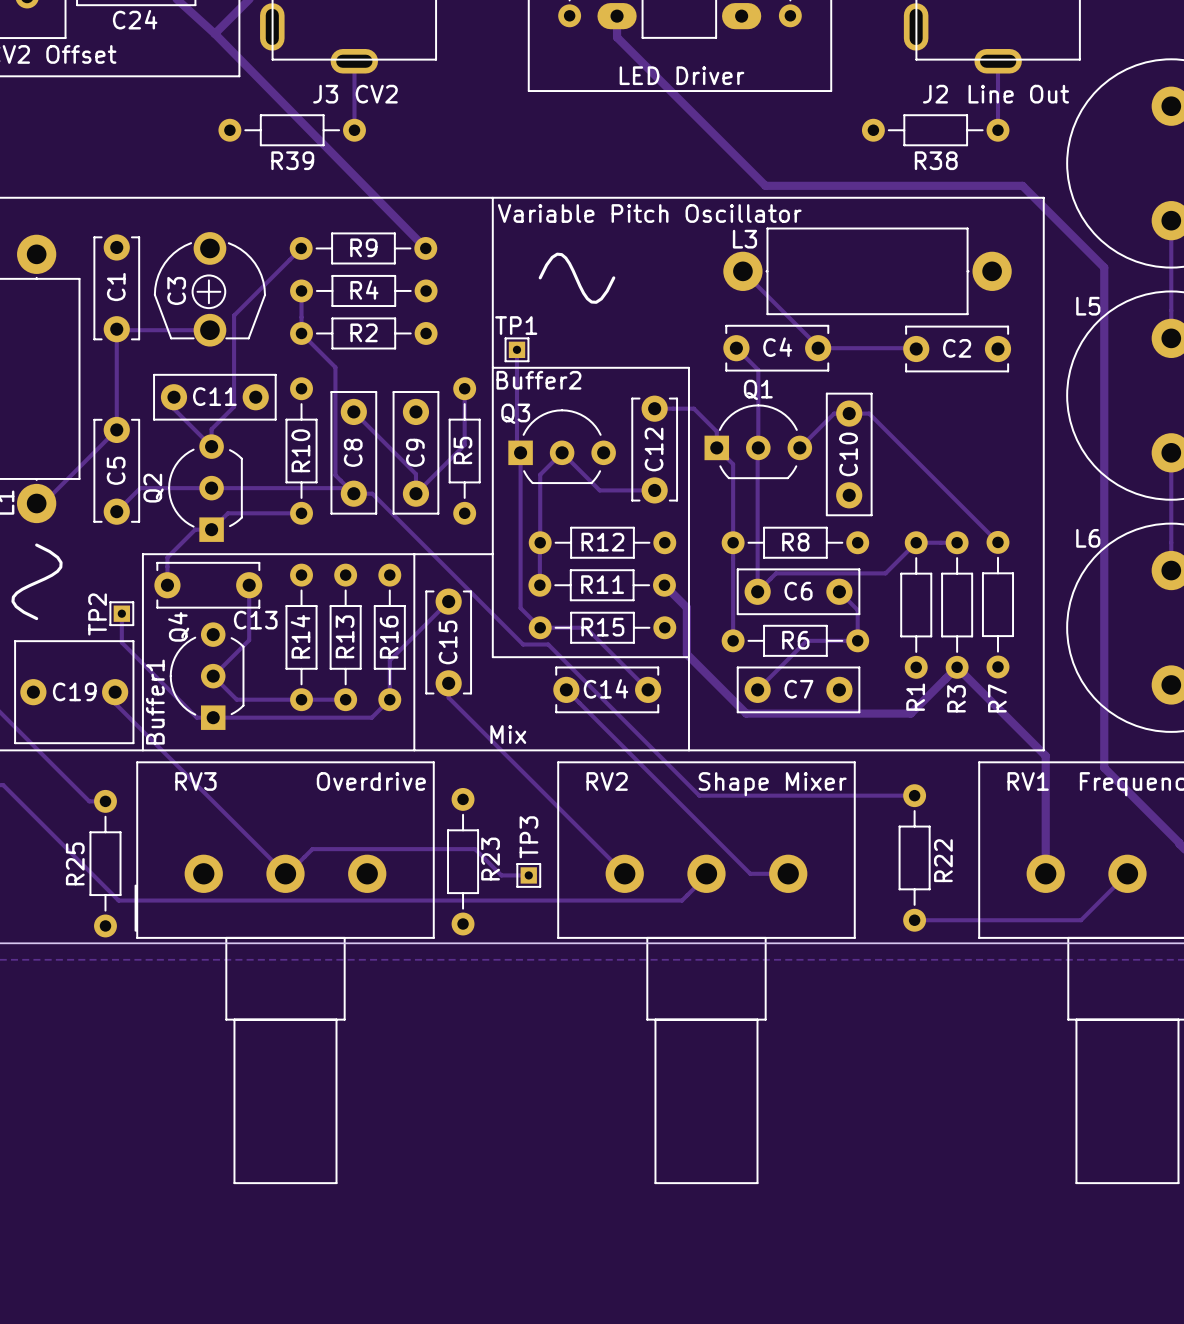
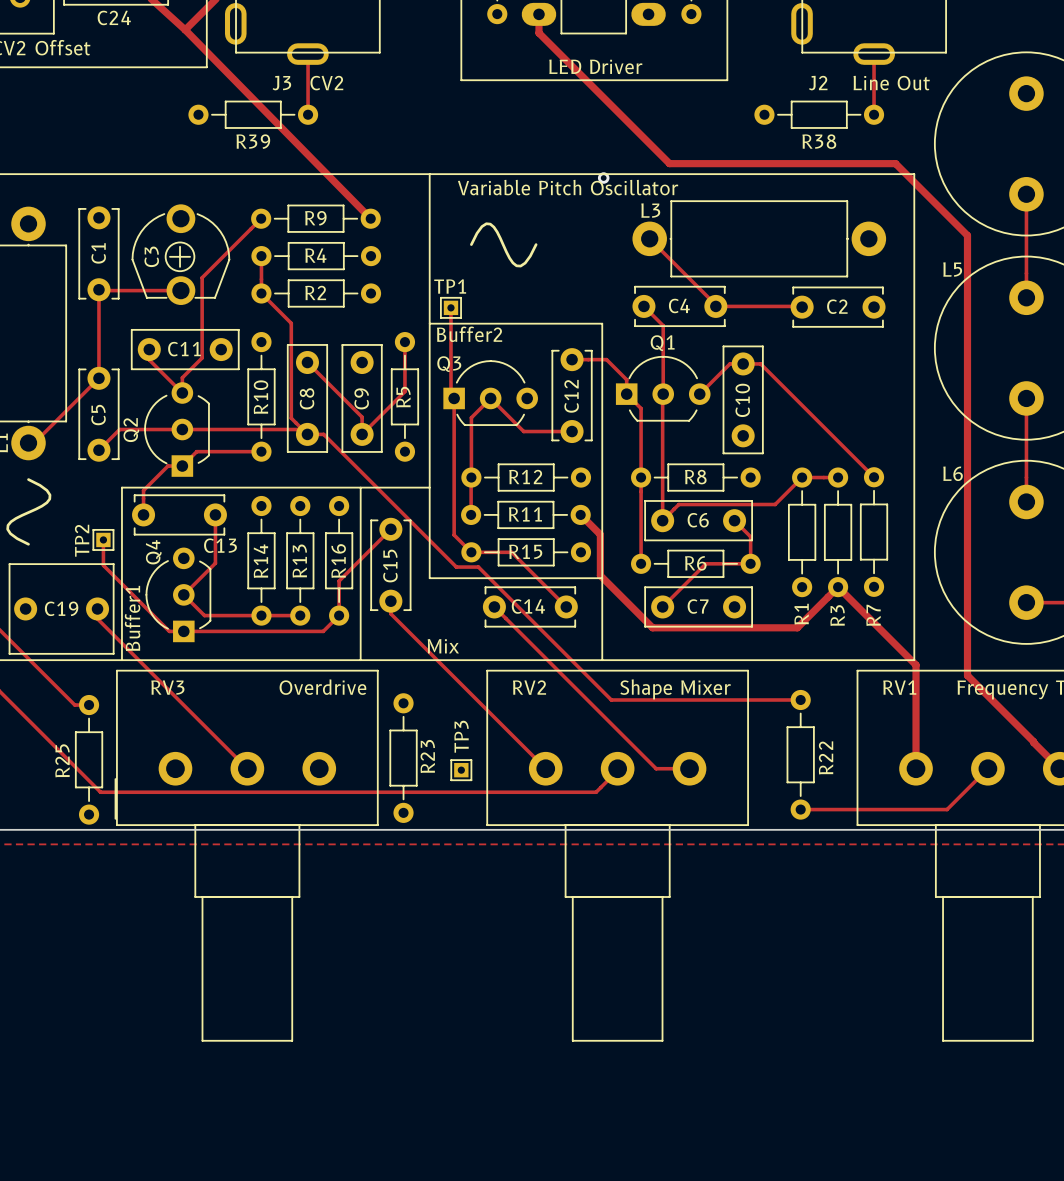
via: none -> (603, 178)
track: (528, 875) (501, 875) (475, 849) (312, 849) (285, 876) -> none

